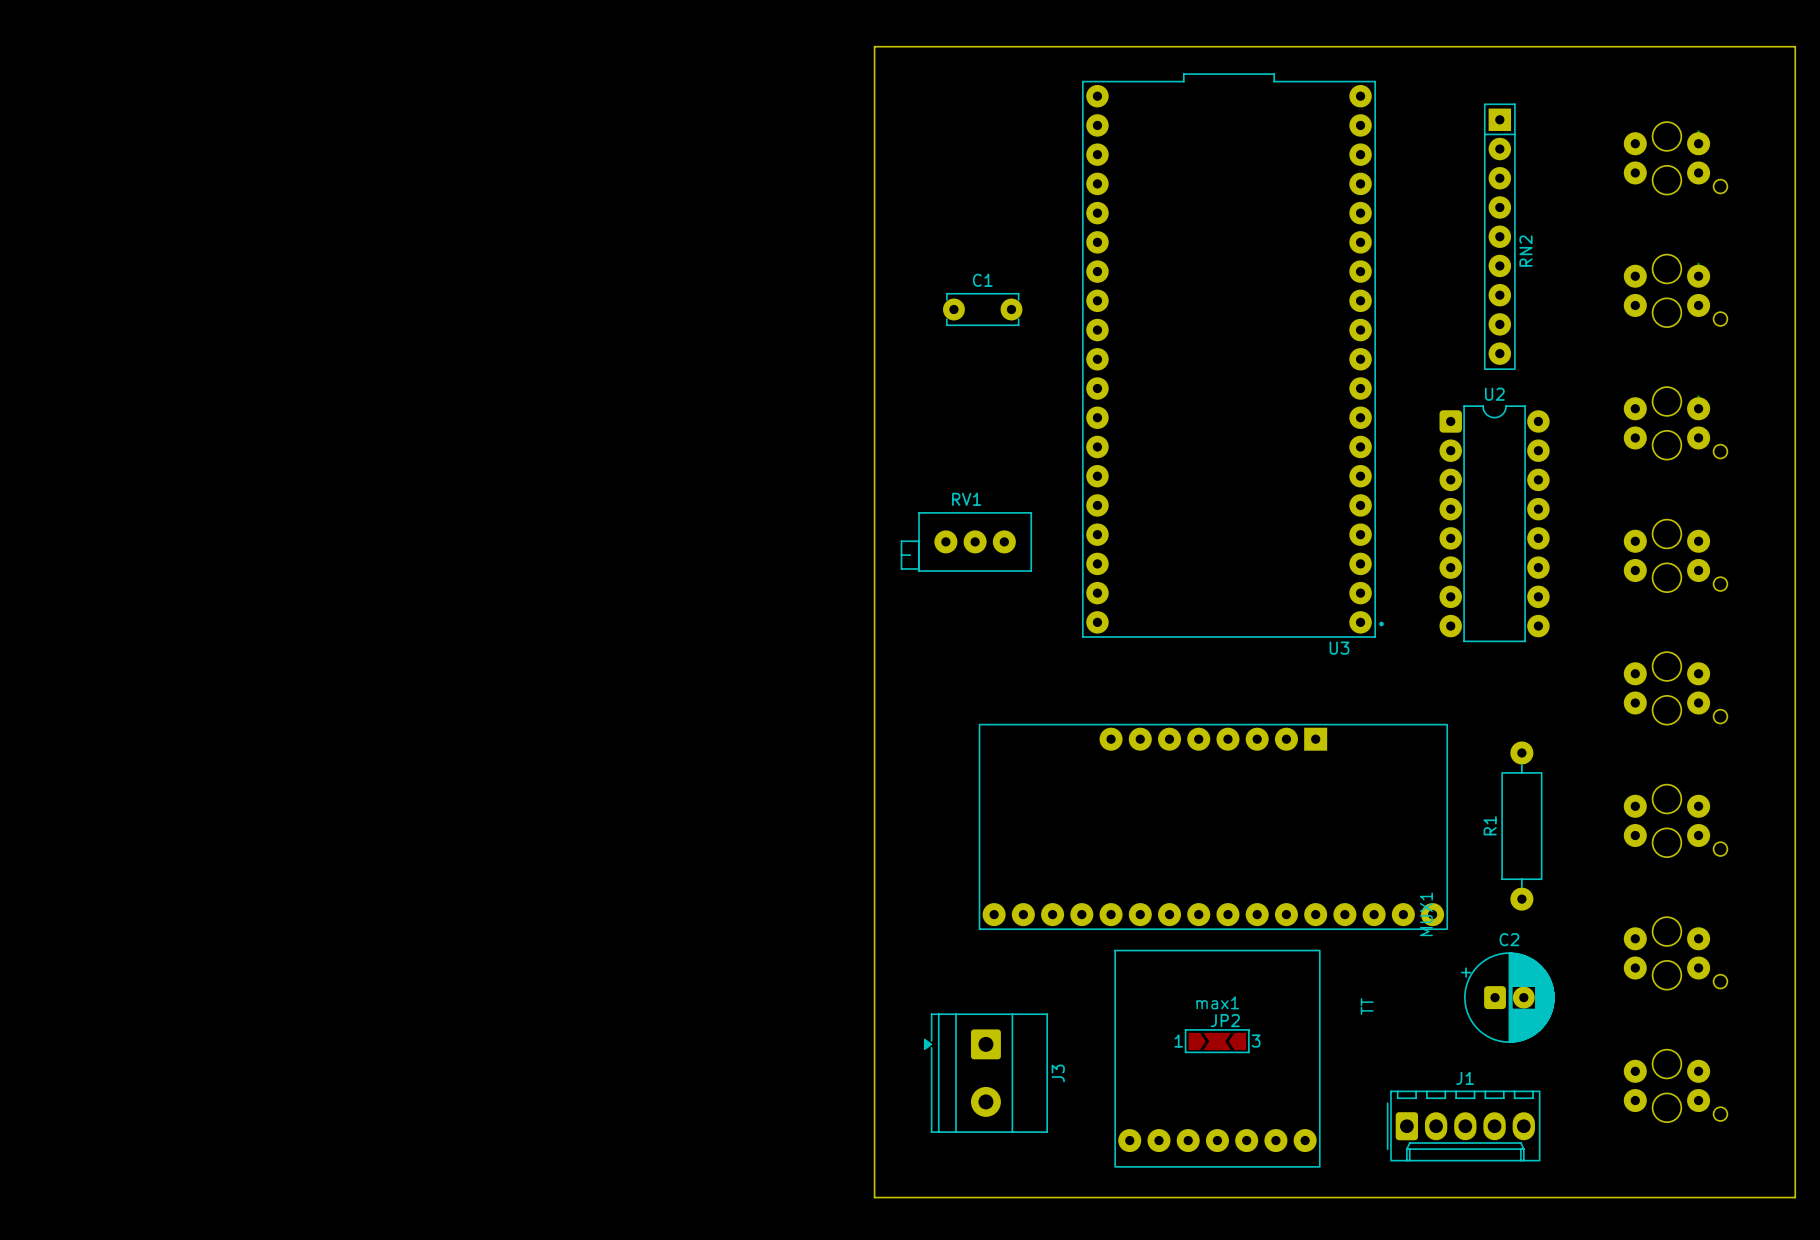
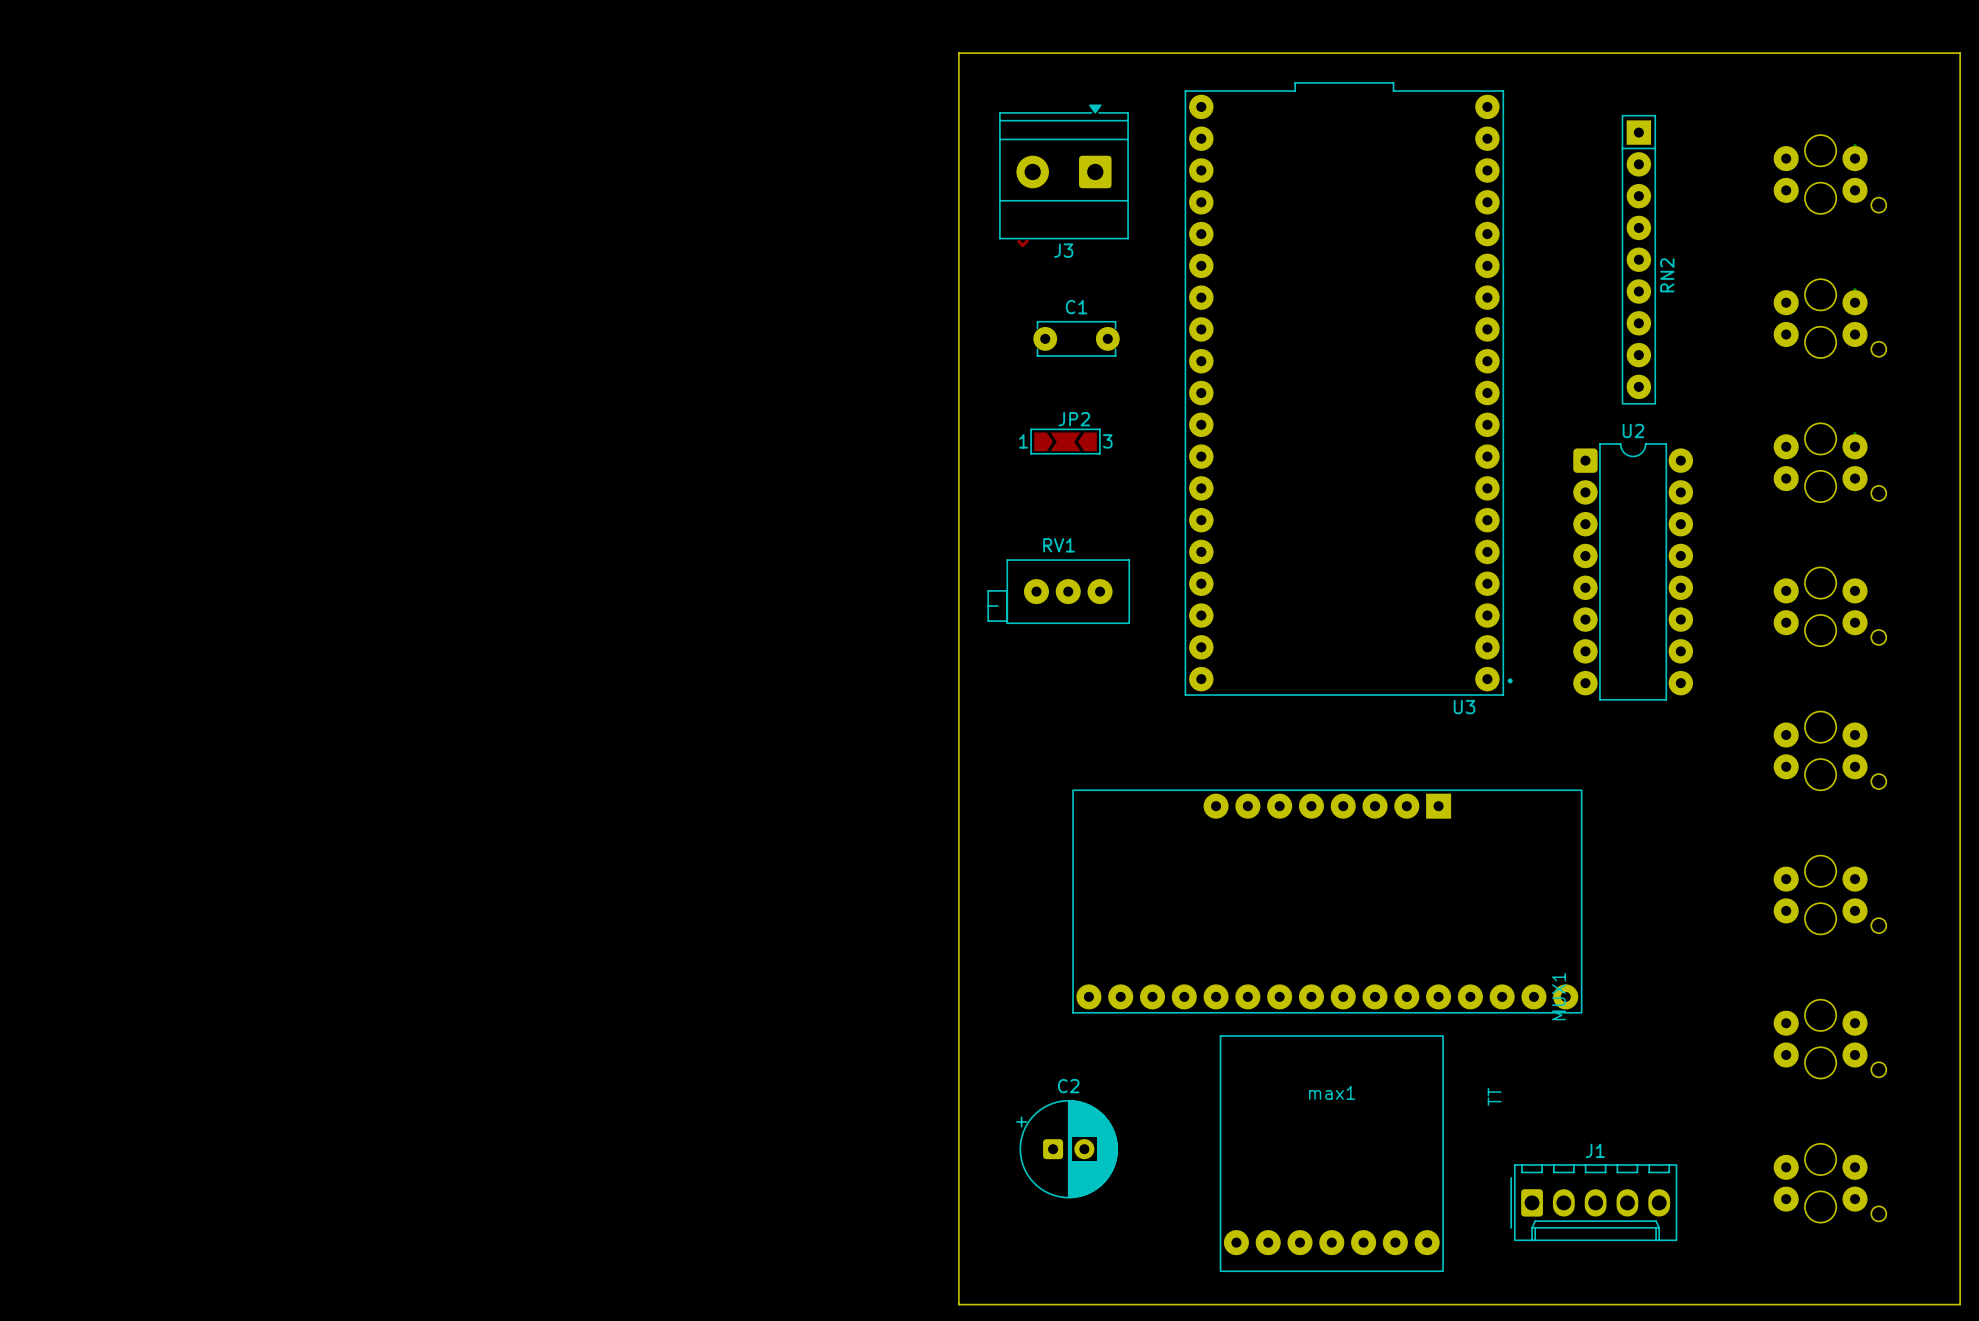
top track: none -> (1027, 240) (1022, 245) (1018, 241)
R1: (1521, 826) -> none
C2 footprint: [1461, 952, 1555, 1043] -> [1016, 1099, 1118, 1199]
JP2 position: (1217, 1041) -> (1065, 441)
J3 rotation: 0° (985, 1073) -> 90° clockwise (1063, 171)
J3 position: (985, 1073) -> (1063, 171)
J1 footprint: [1386, 1090, 1541, 1162] -> [1510, 1164, 1678, 1242]

